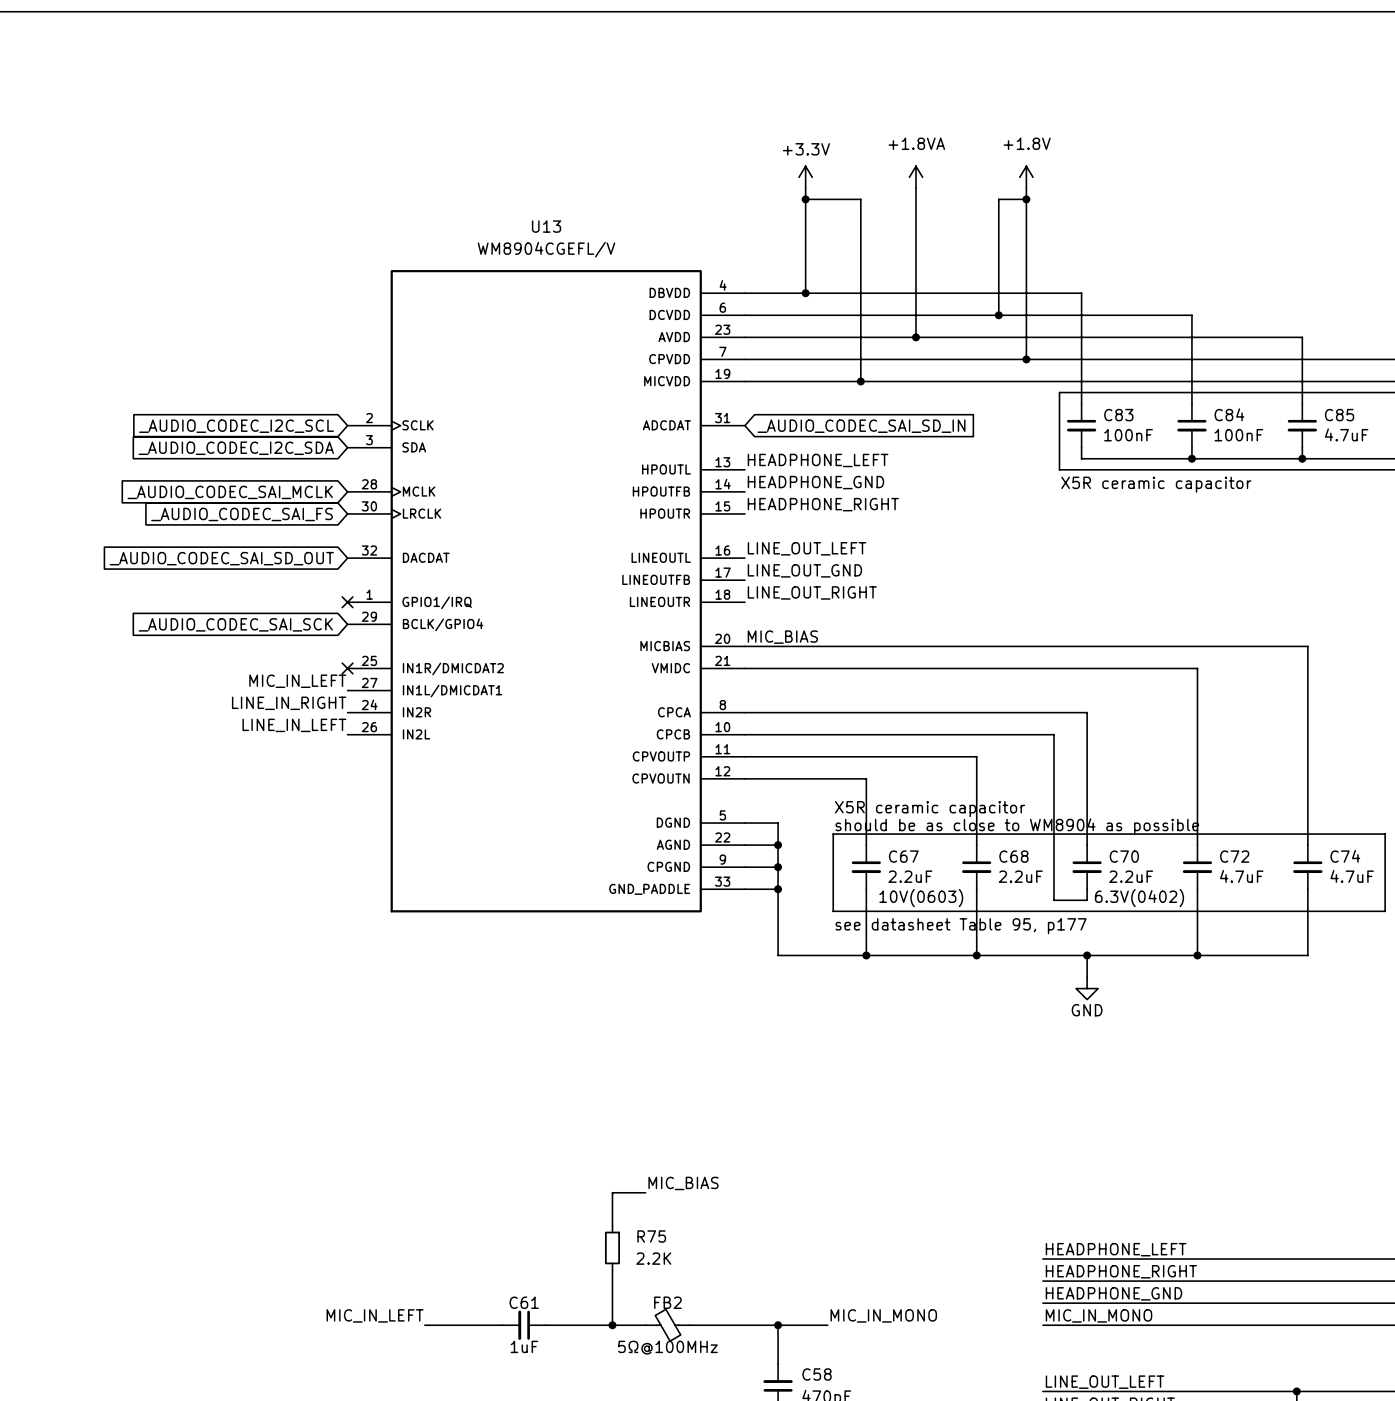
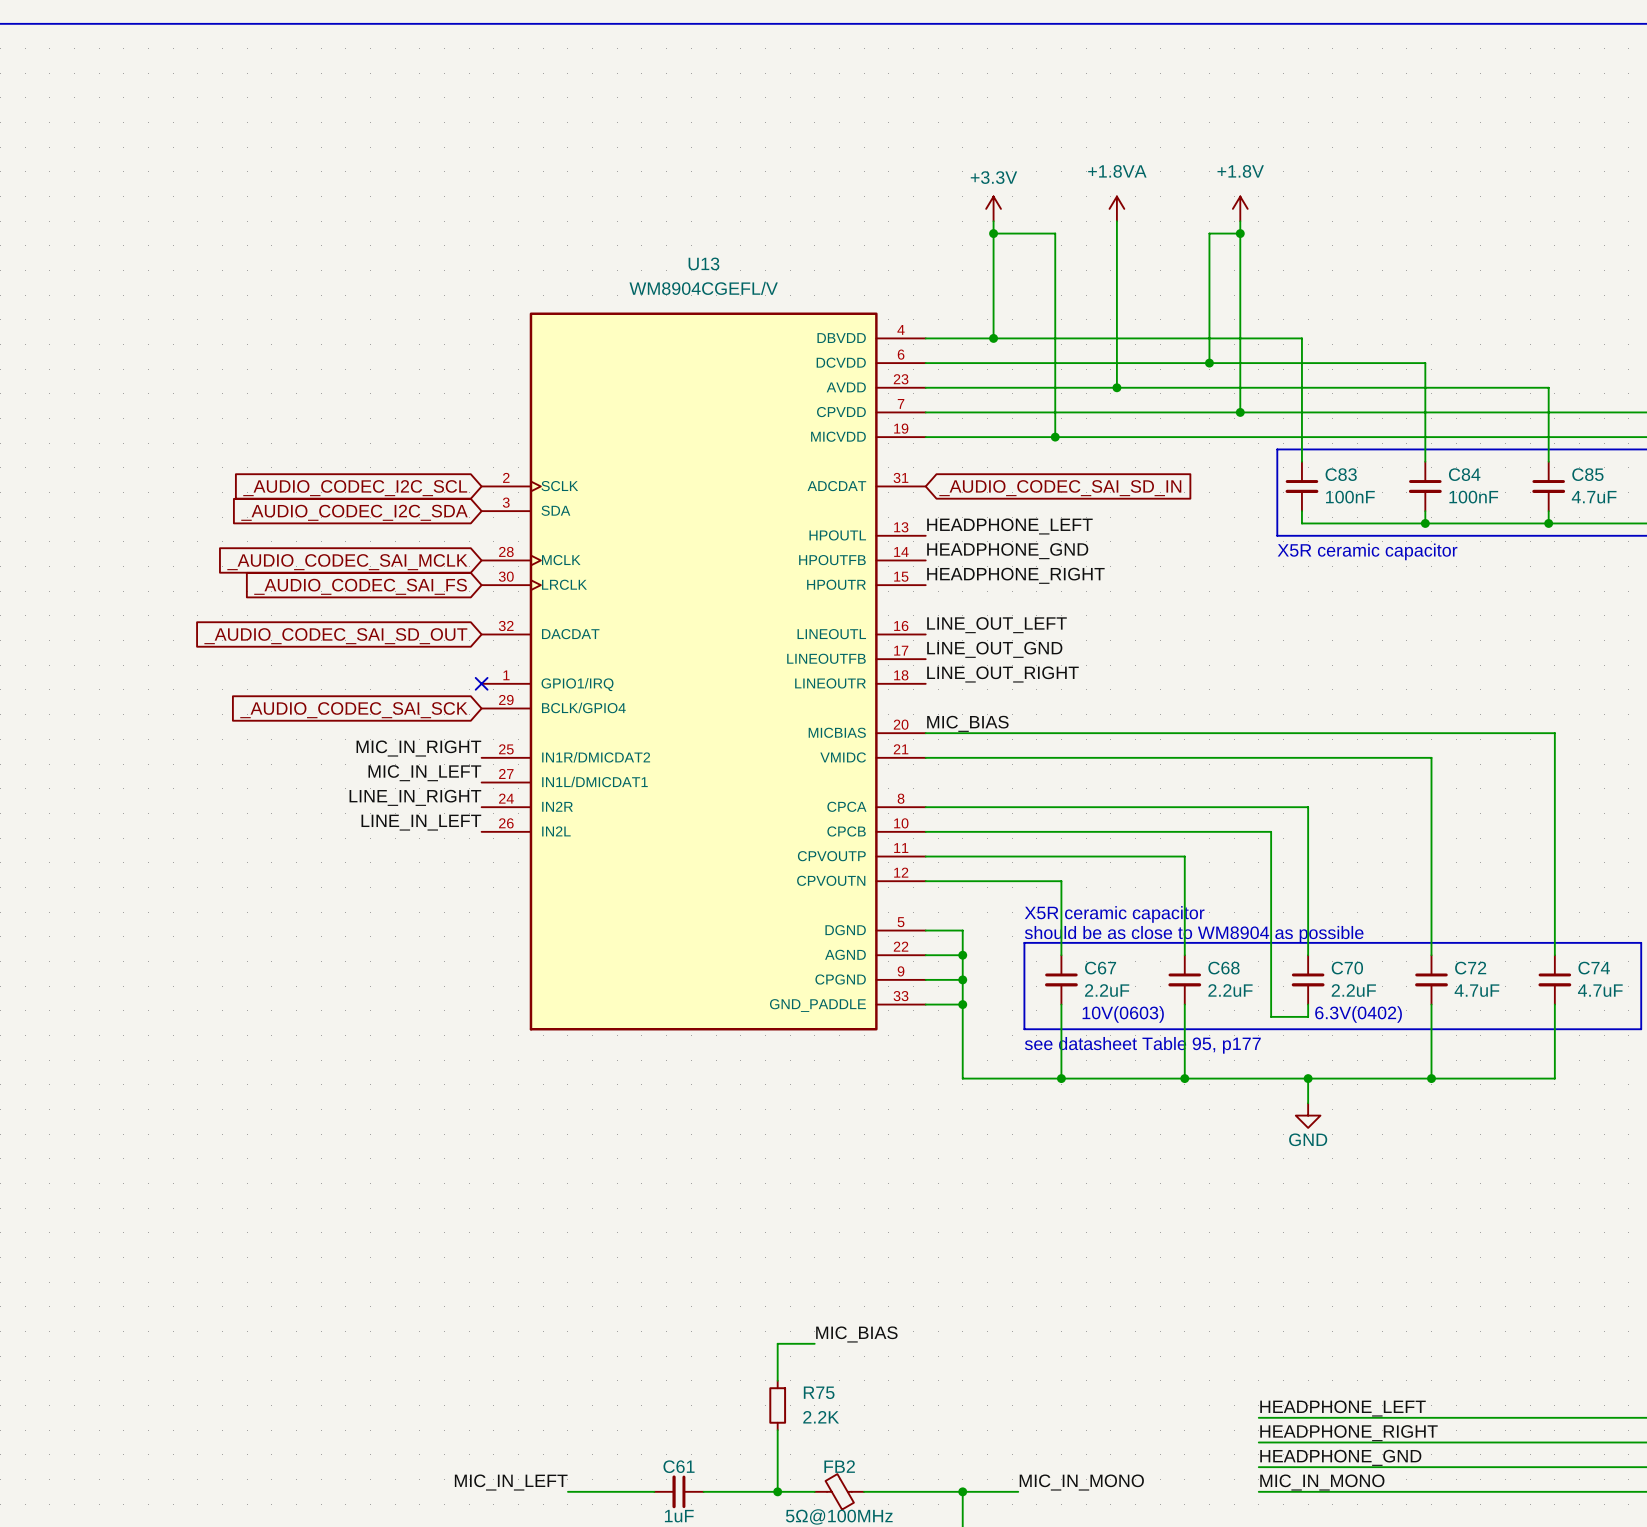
label: none -> MIC_IN_RIGHT (418, 748)
no-connect mark: (347, 668) -> none

